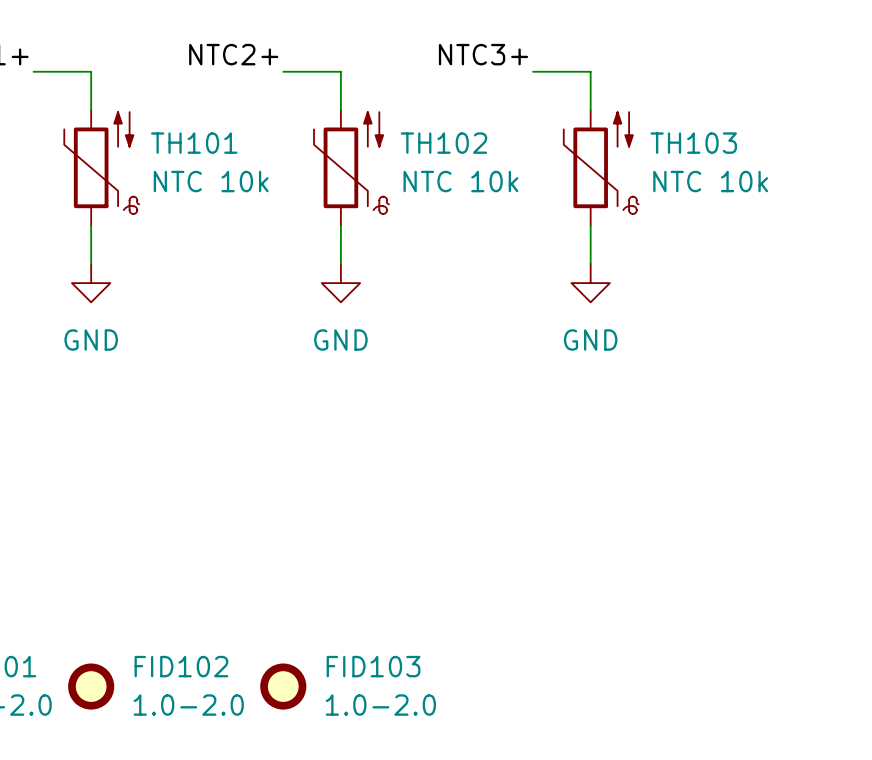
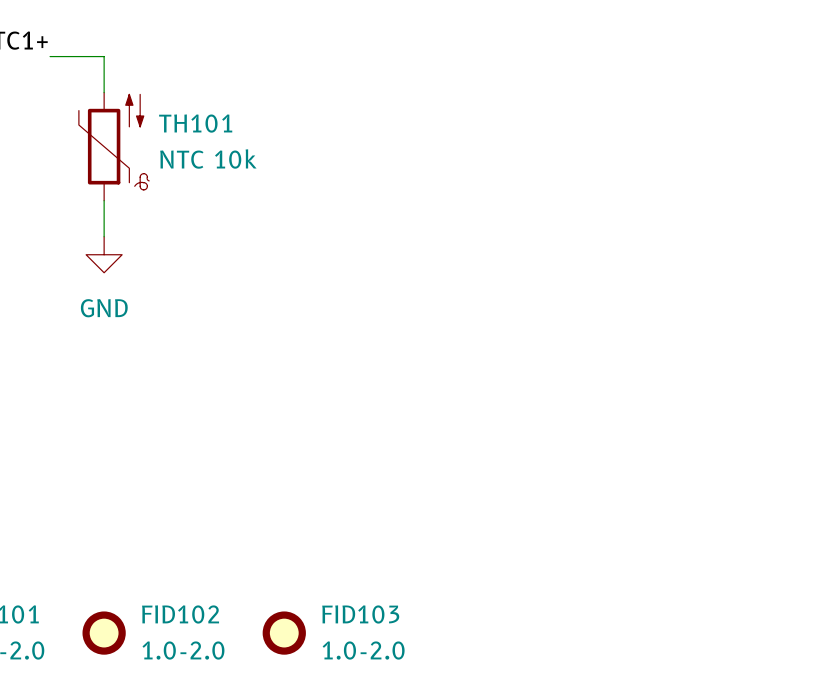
label: NTC2+ (233, 54) -> none
label: NTC3+ (483, 54) -> none
wire: (283, 71) (340, 71) (340, 110) -> none
wire: (533, 71) (590, 71) (590, 110) -> none
TH102: NTC 10k (351, 167) -> none
TH103: NTC 10k (601, 167) -> none
wire: (340, 225) (340, 263) -> none
wire: (590, 225) (590, 263) -> none
power symbol: GND (340, 283) -> none
power symbol: GND (590, 283) -> none

